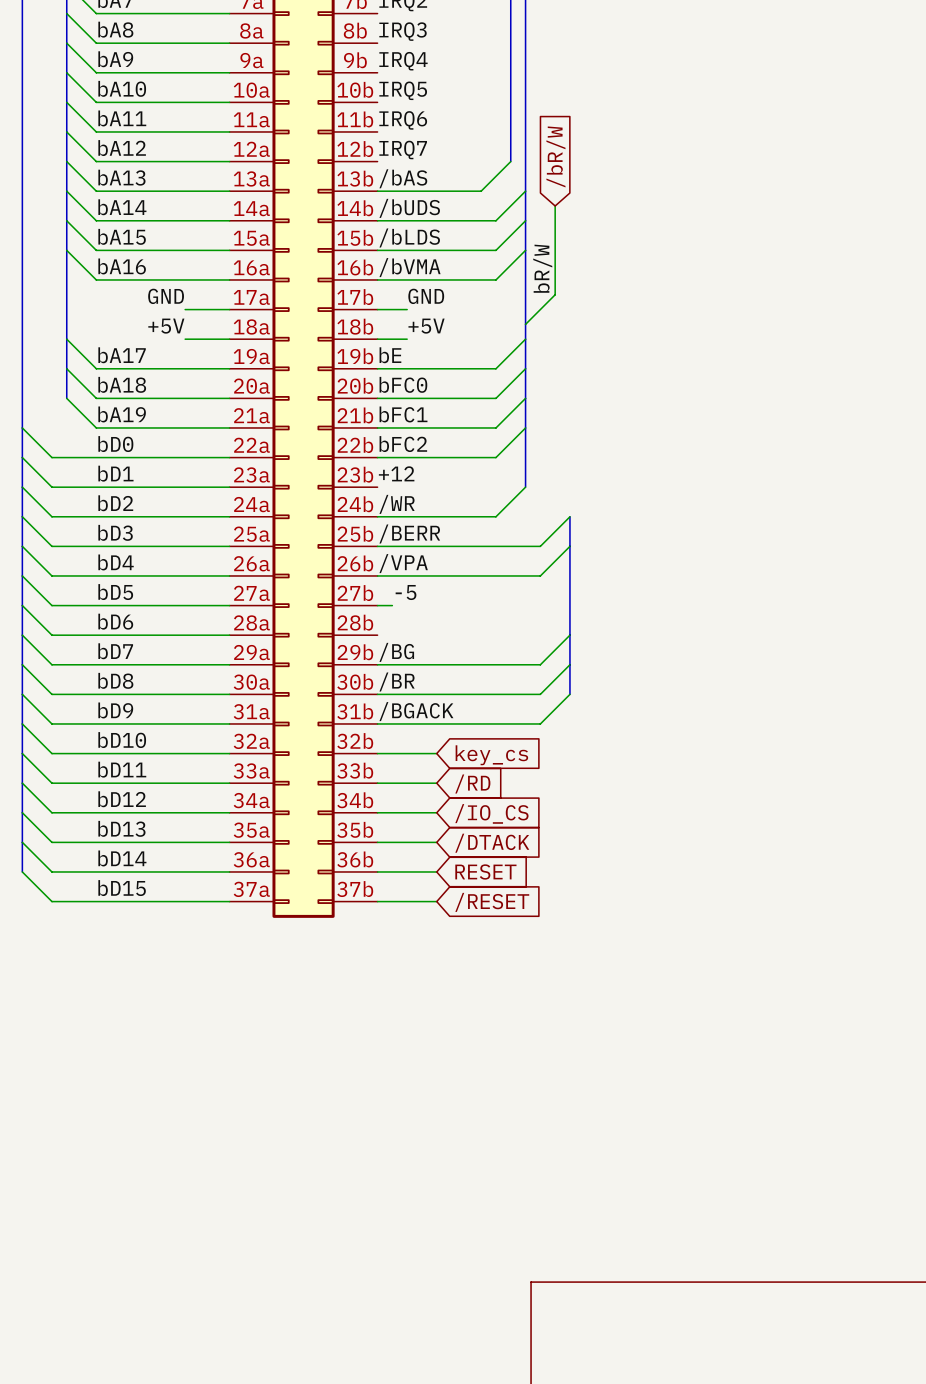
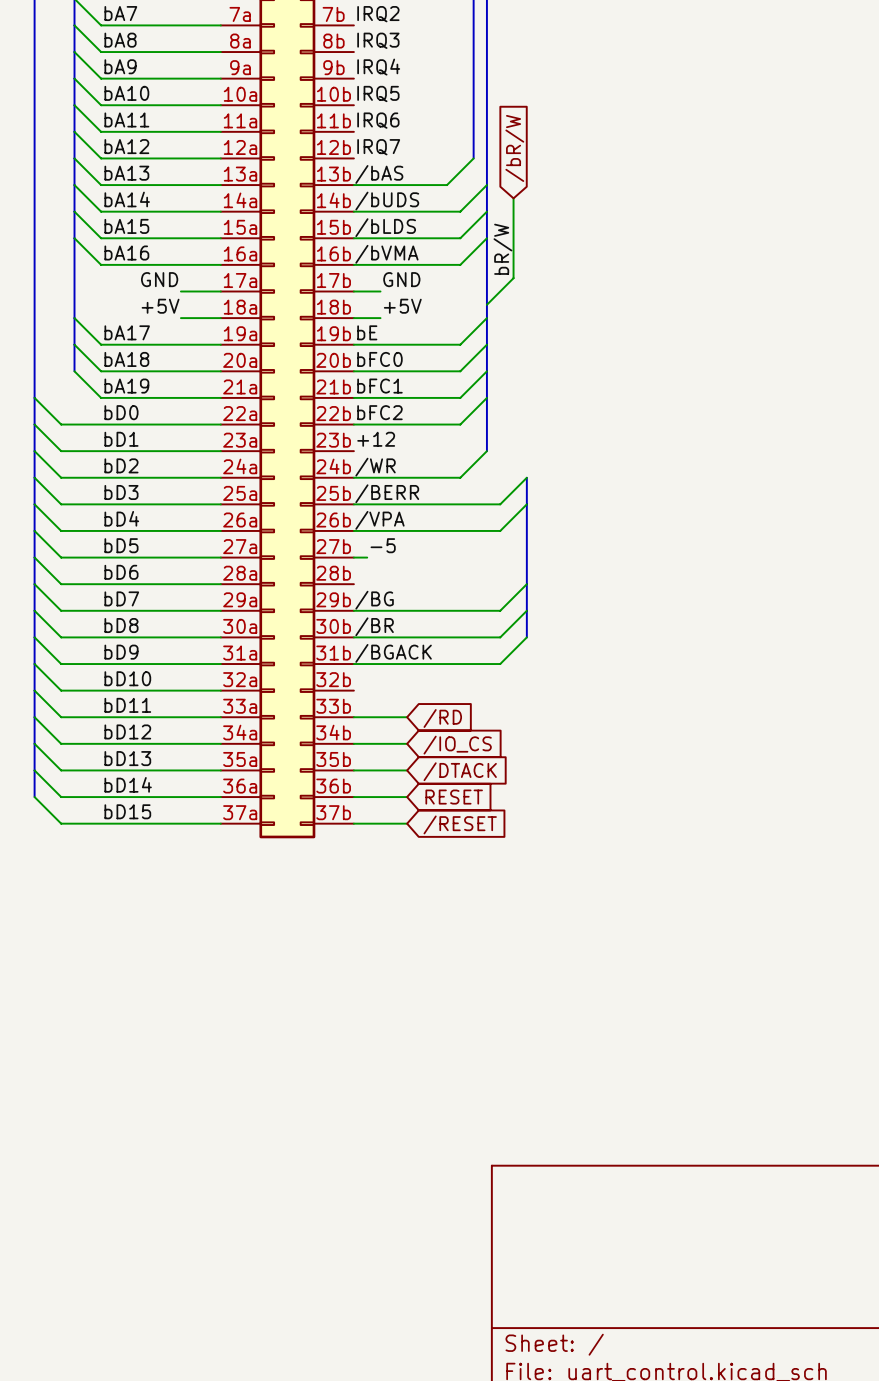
wire: (377, 753) (436, 753) -> none
global label: key_cs (491, 755) -> none

